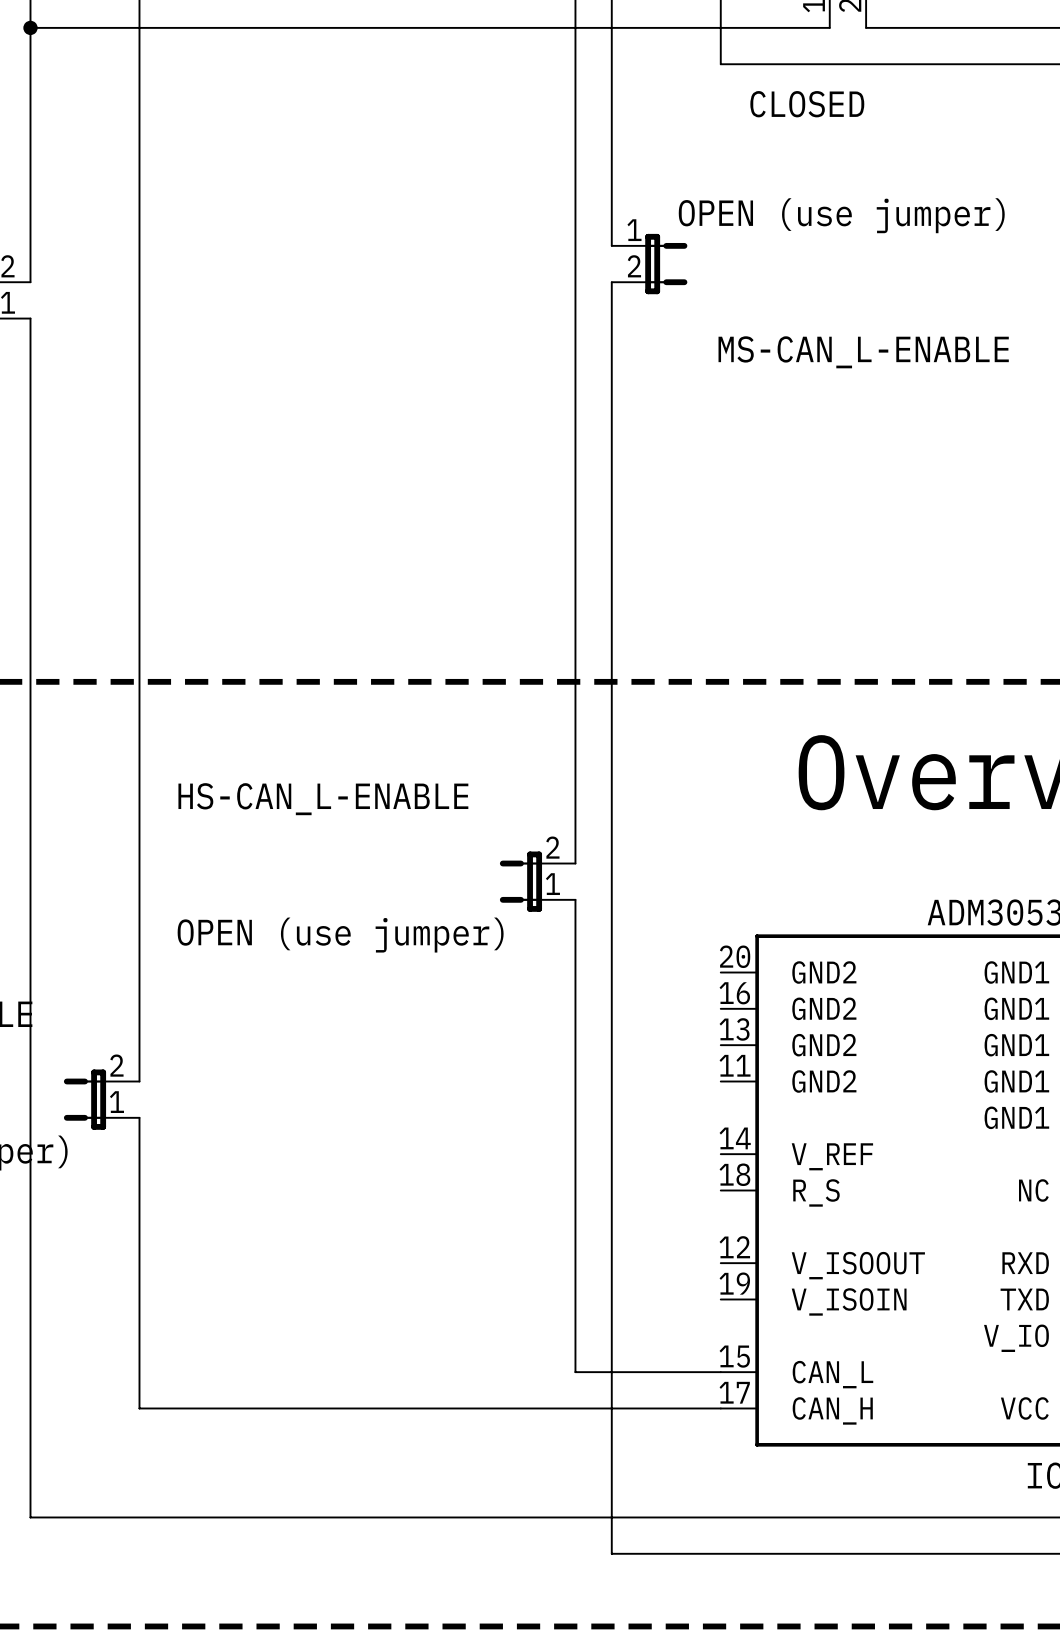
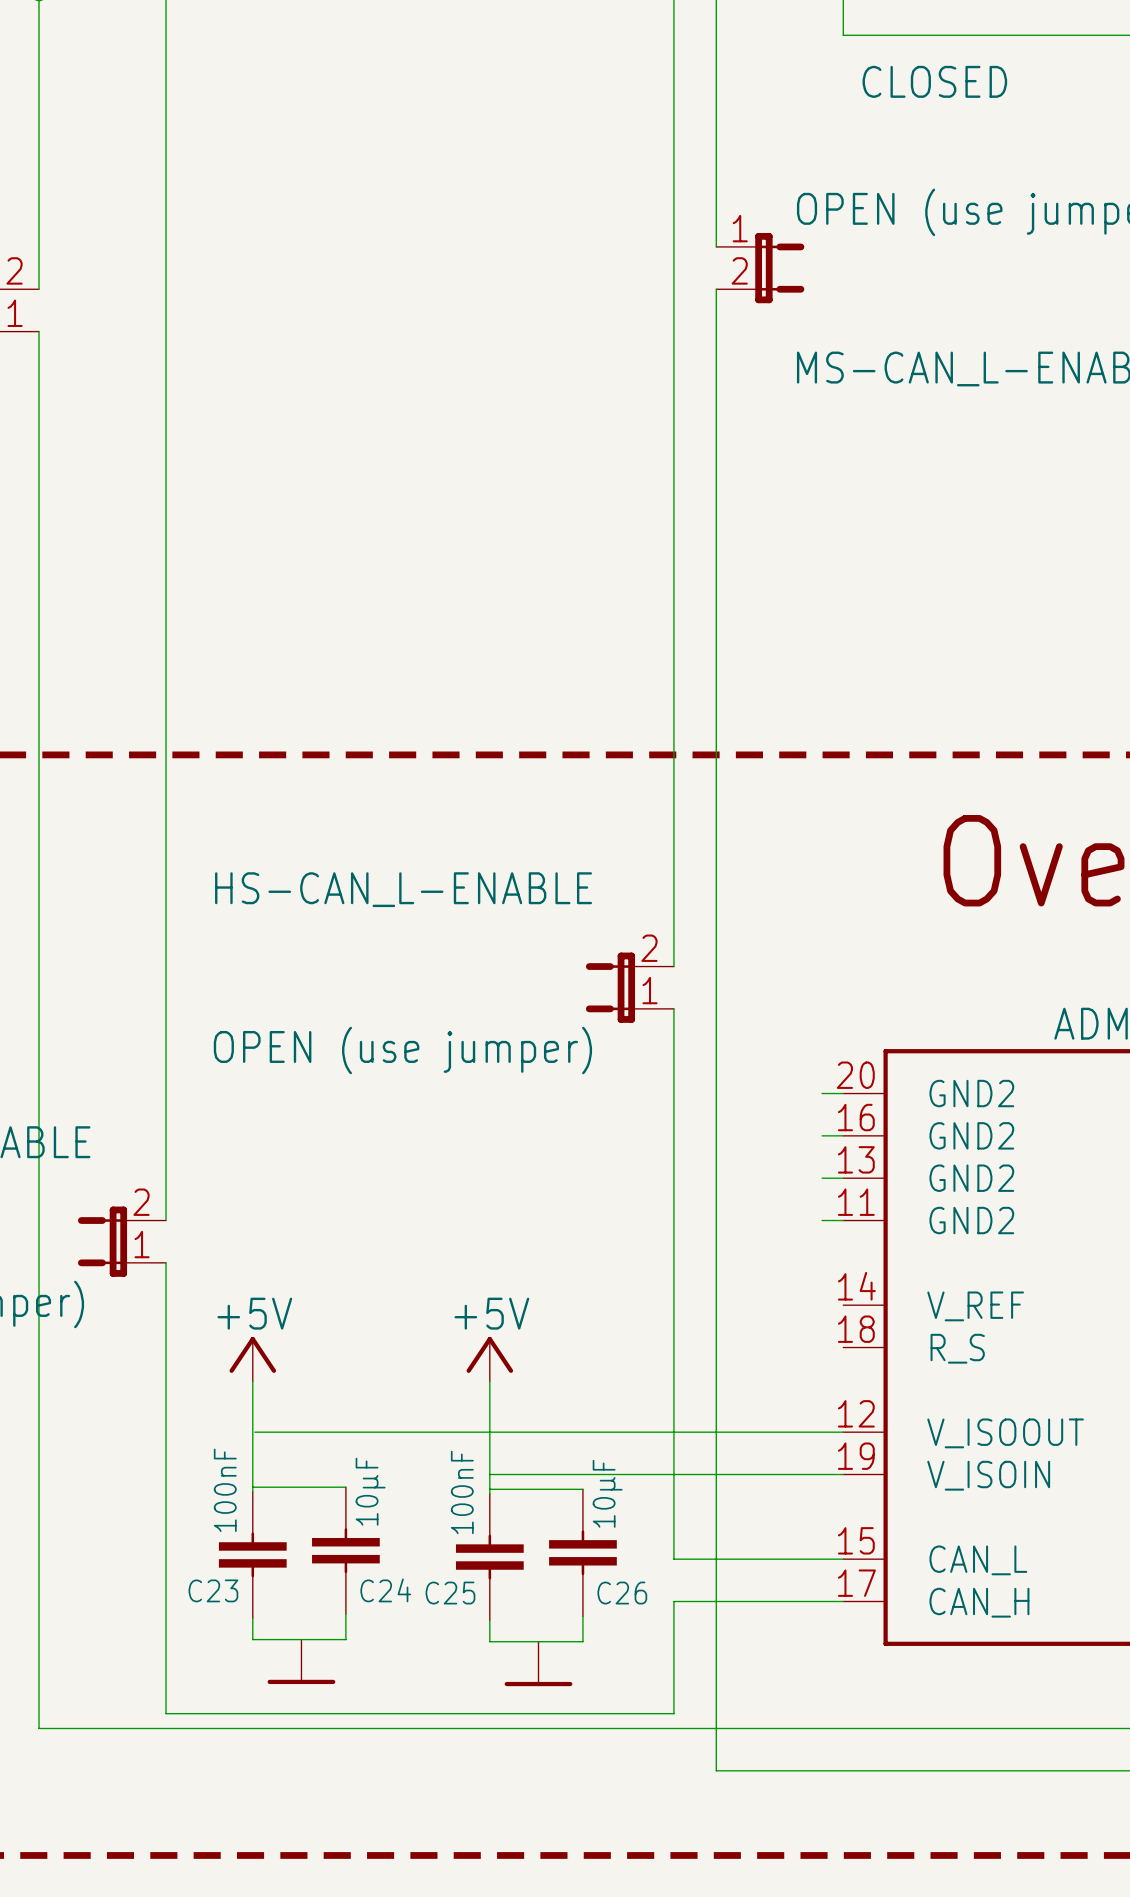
wire: none -> (822, 1093) (843, 1093)
wire: none -> (822, 1135) (843, 1135)
wire: none -> (822, 1178) (843, 1178)
wire: none -> (822, 1220) (843, 1220)
power symbol: none -> +5V (252, 1359)
power symbol: none -> +5V (489, 1359)
wire: none -> (252, 1381) (252, 1491)
wire: none -> (489, 1381) (489, 1493)
wire: none -> (254, 1432) (843, 1432)
wire: none -> (489, 1474) (843, 1474)
wire: none -> (252, 1487) (345, 1487)
wire: none -> (489, 1489) (582, 1489)
C24: none -> 10µF (345, 1550)
C26: none -> 10µF (582, 1552)
C23: none -> 100nF (252, 1554)
C25: none -> 100nF (489, 1557)
wire: (139, 1408) (575, 1408) -> (166, 1601) (166, 1713) (673, 1713) (673, 1601)
wire: none -> (345, 1614) (345, 1639) (252, 1639) (252, 1618)
wire: none -> (582, 1616) (582, 1641) (489, 1641) (489, 1620)
power symbol: none -> (301, 1661)
power symbol: none -> (538, 1663)

